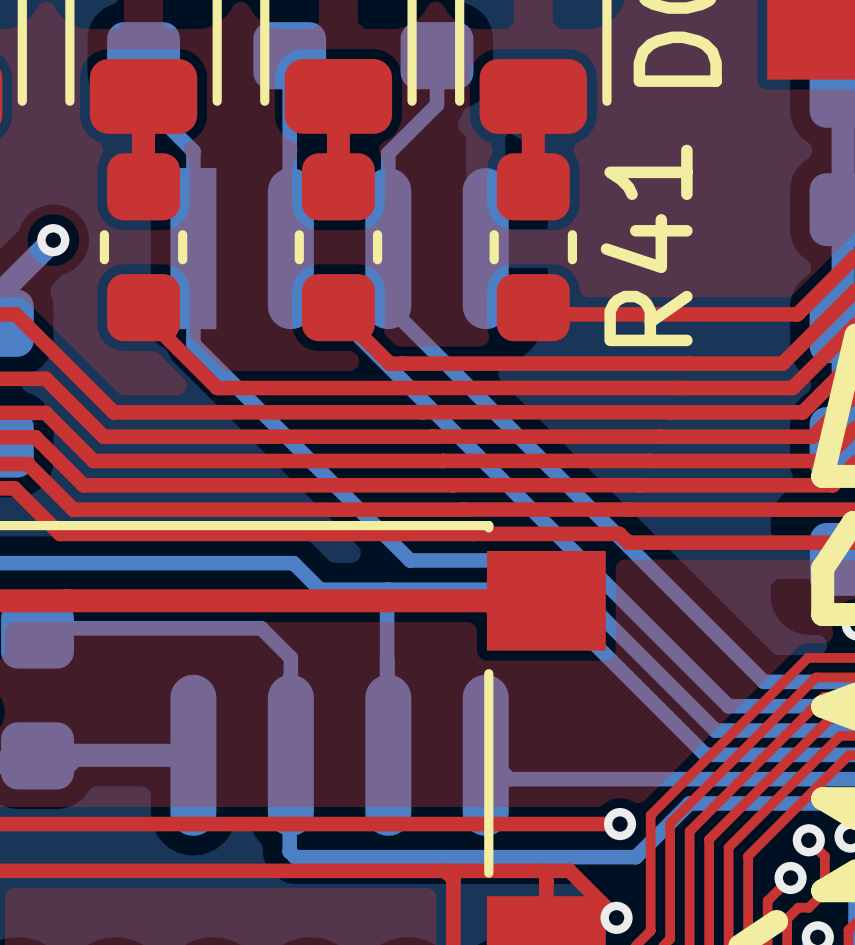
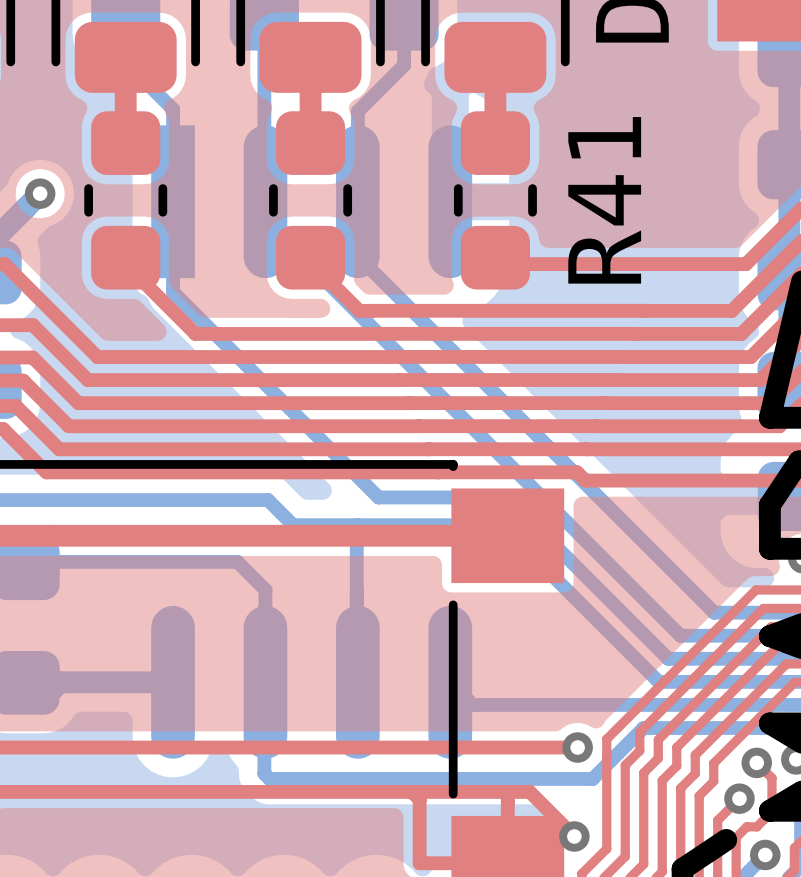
top track: (685, 807) (670, 823) (670, 842) -> (639, 732) (639, 750) (625, 765)
top track: (705, 815) (689, 831) (689, 850) -> (658, 739) (658, 758) (643, 772)
top track: (724, 824) (709, 839) (709, 858) -> (676, 747) (676, 766) (662, 780)
top track: (743, 832) (728, 847) (728, 866) -> (695, 755) (695, 773) (680, 788)
top track: (763, 840) (748, 856) (748, 875) -> (713, 763) (713, 781) (699, 795)

